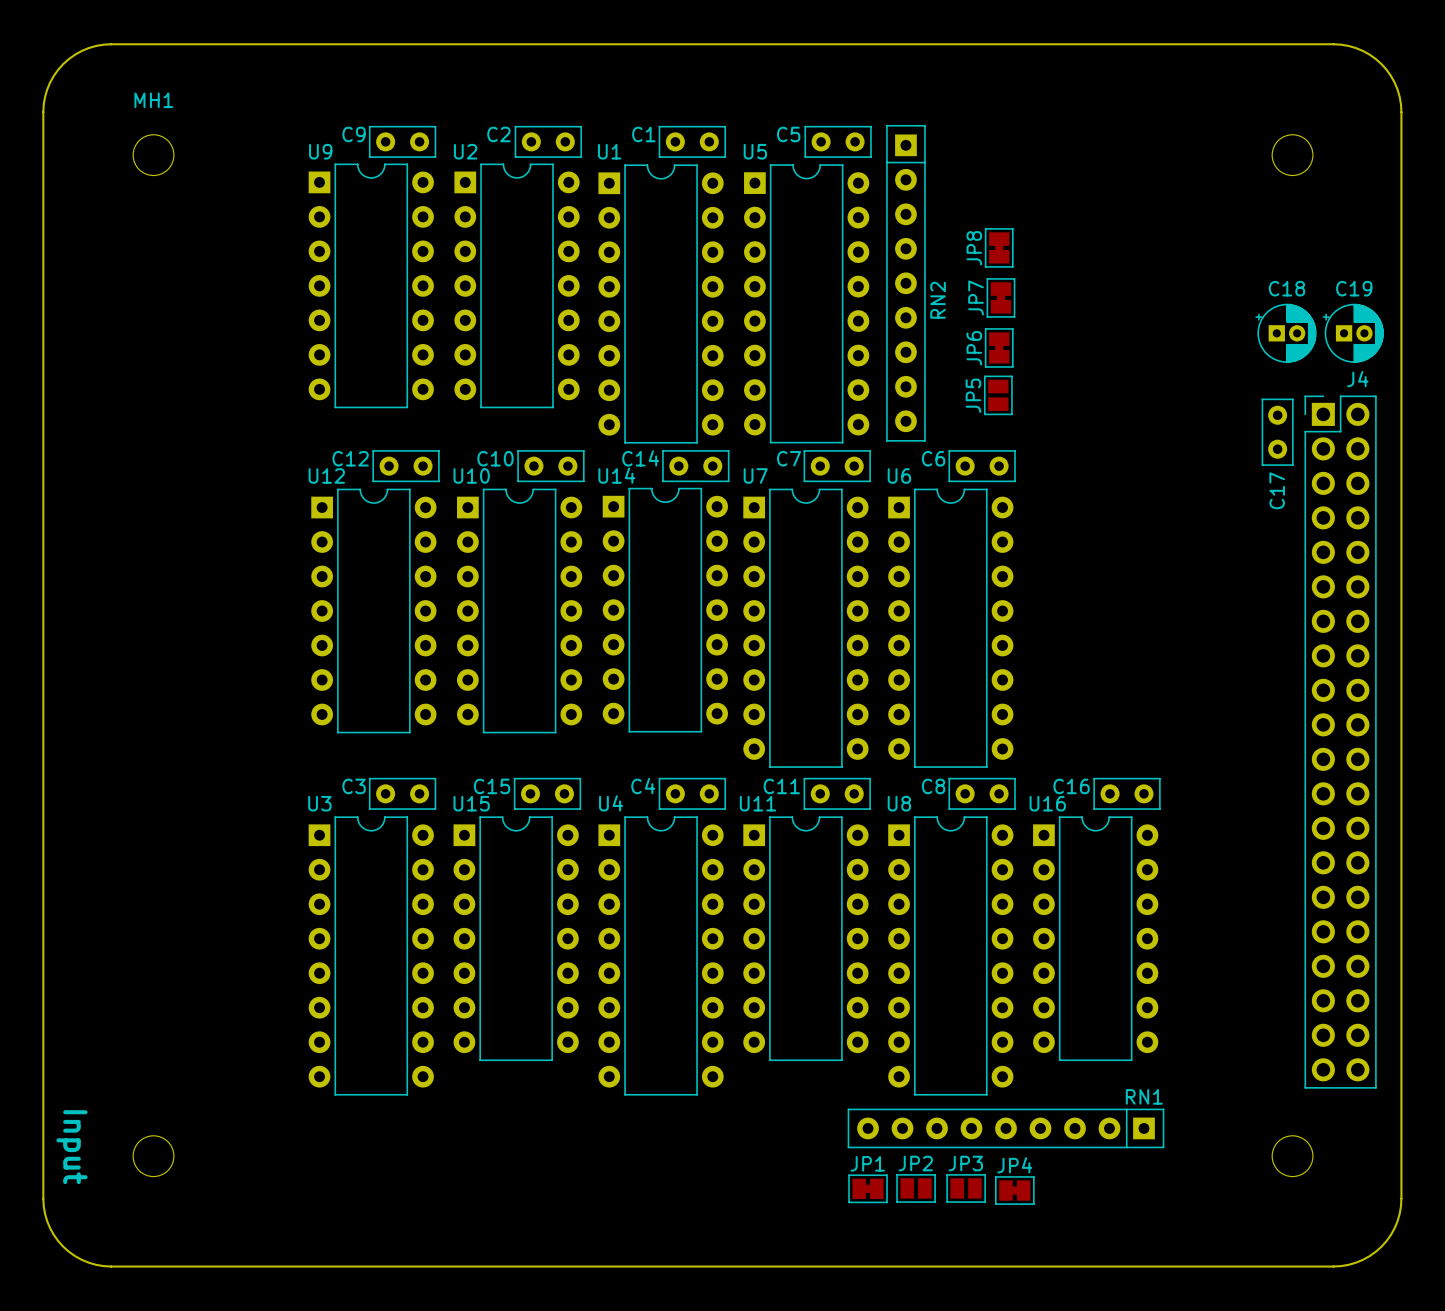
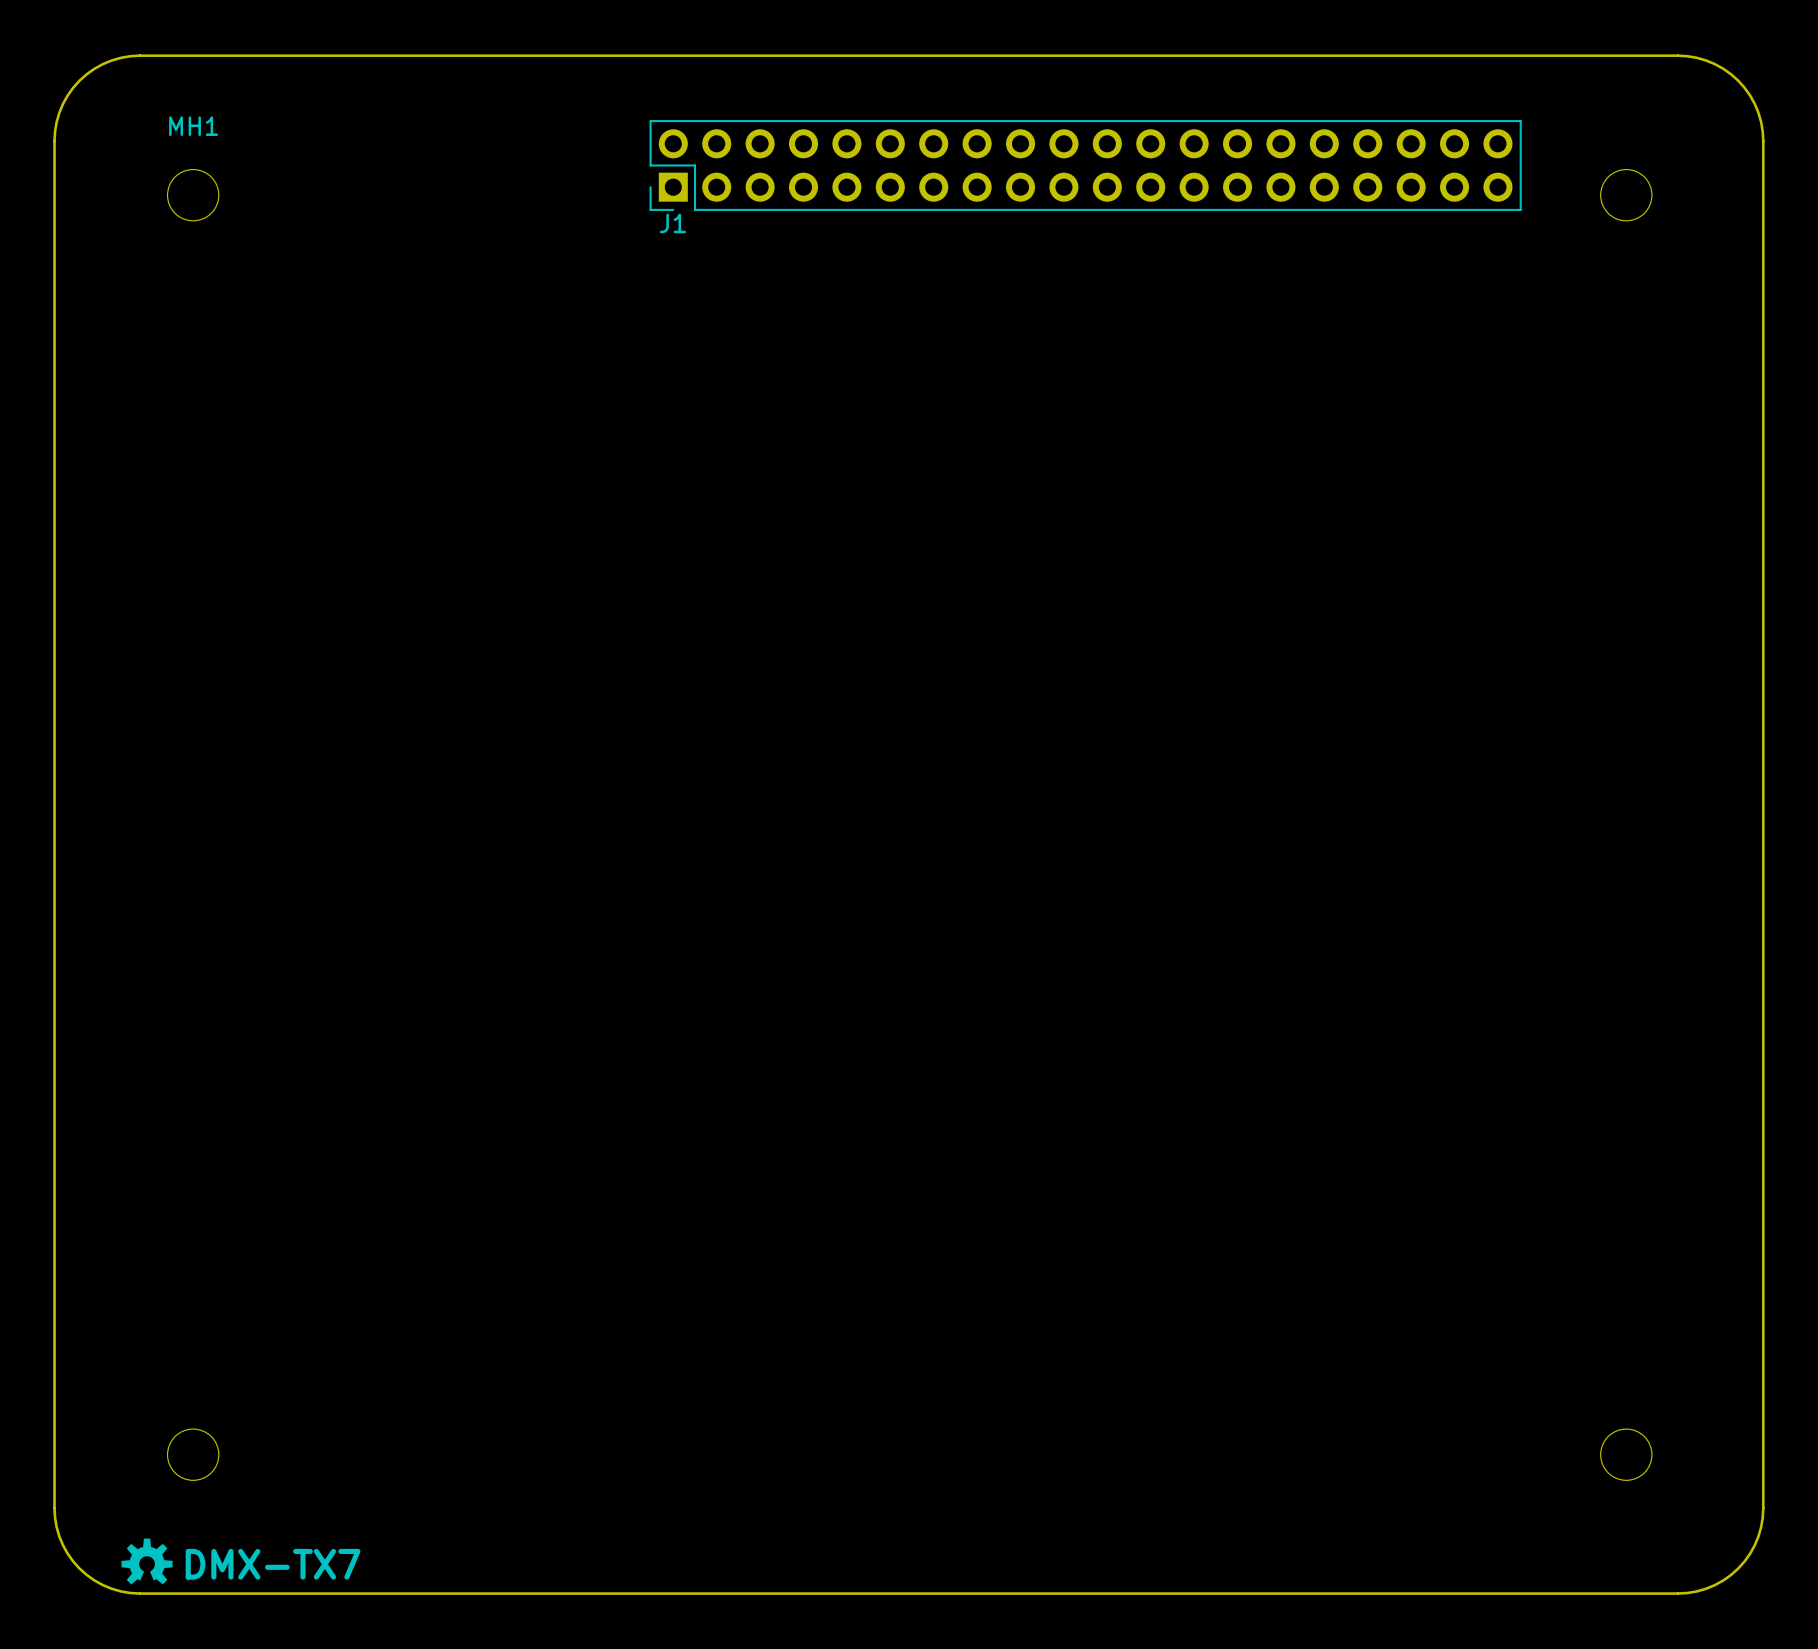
J1: none -> (1085, 165)
C9: (402, 141) -> none
C2: (548, 141) -> none
C1: (692, 141) -> none
C5: (838, 141) -> none
JP8: (999, 247) -> none
RN2: (905, 283) -> none
U9: (371, 285) -> none
U2: (517, 285) -> none
JP7: (1000, 297) -> none
U5: (806, 303) -> none
U1: (661, 304) -> none
C18: (1285, 333) -> none
C19: (1353, 333) -> none
JP6: (999, 347) -> none
JP5: (998, 395) -> none
C17: (1277, 432) -> none
C12: (406, 466) -> none
C10: (550, 466) -> none
C14: (695, 466) -> none
C7: (837, 466) -> none
C6: (982, 466) -> none
U14: (665, 610) -> none
U12: (373, 611) -> none
U10: (519, 611) -> none
U7: (805, 628) -> none
U6: (950, 628) -> none
J4: (1340, 742) -> none
C3: (402, 793) -> none
C15: (547, 793) -> none
C4: (692, 793) -> none
C11: (837, 793) -> none
C8: (982, 793) -> none
C16: (1127, 793) -> none
U15: (516, 938) -> none
U11: (805, 938) -> none
U16: (1095, 938) -> none
U3: (371, 955) -> none
U4: (661, 955) -> none
U8: (950, 955) -> none
RN1: (1006, 1128) -> none
text: Input (71, 1147) -> none
JP1: (868, 1188) -> none
JP2: (916, 1188) -> none
JP3: (966, 1188) -> none
JP4: (1014, 1190) -> none
drawing: none -> [121, 1538, 173, 1585]
text: none -> DMX-TX7 (273, 1564)

